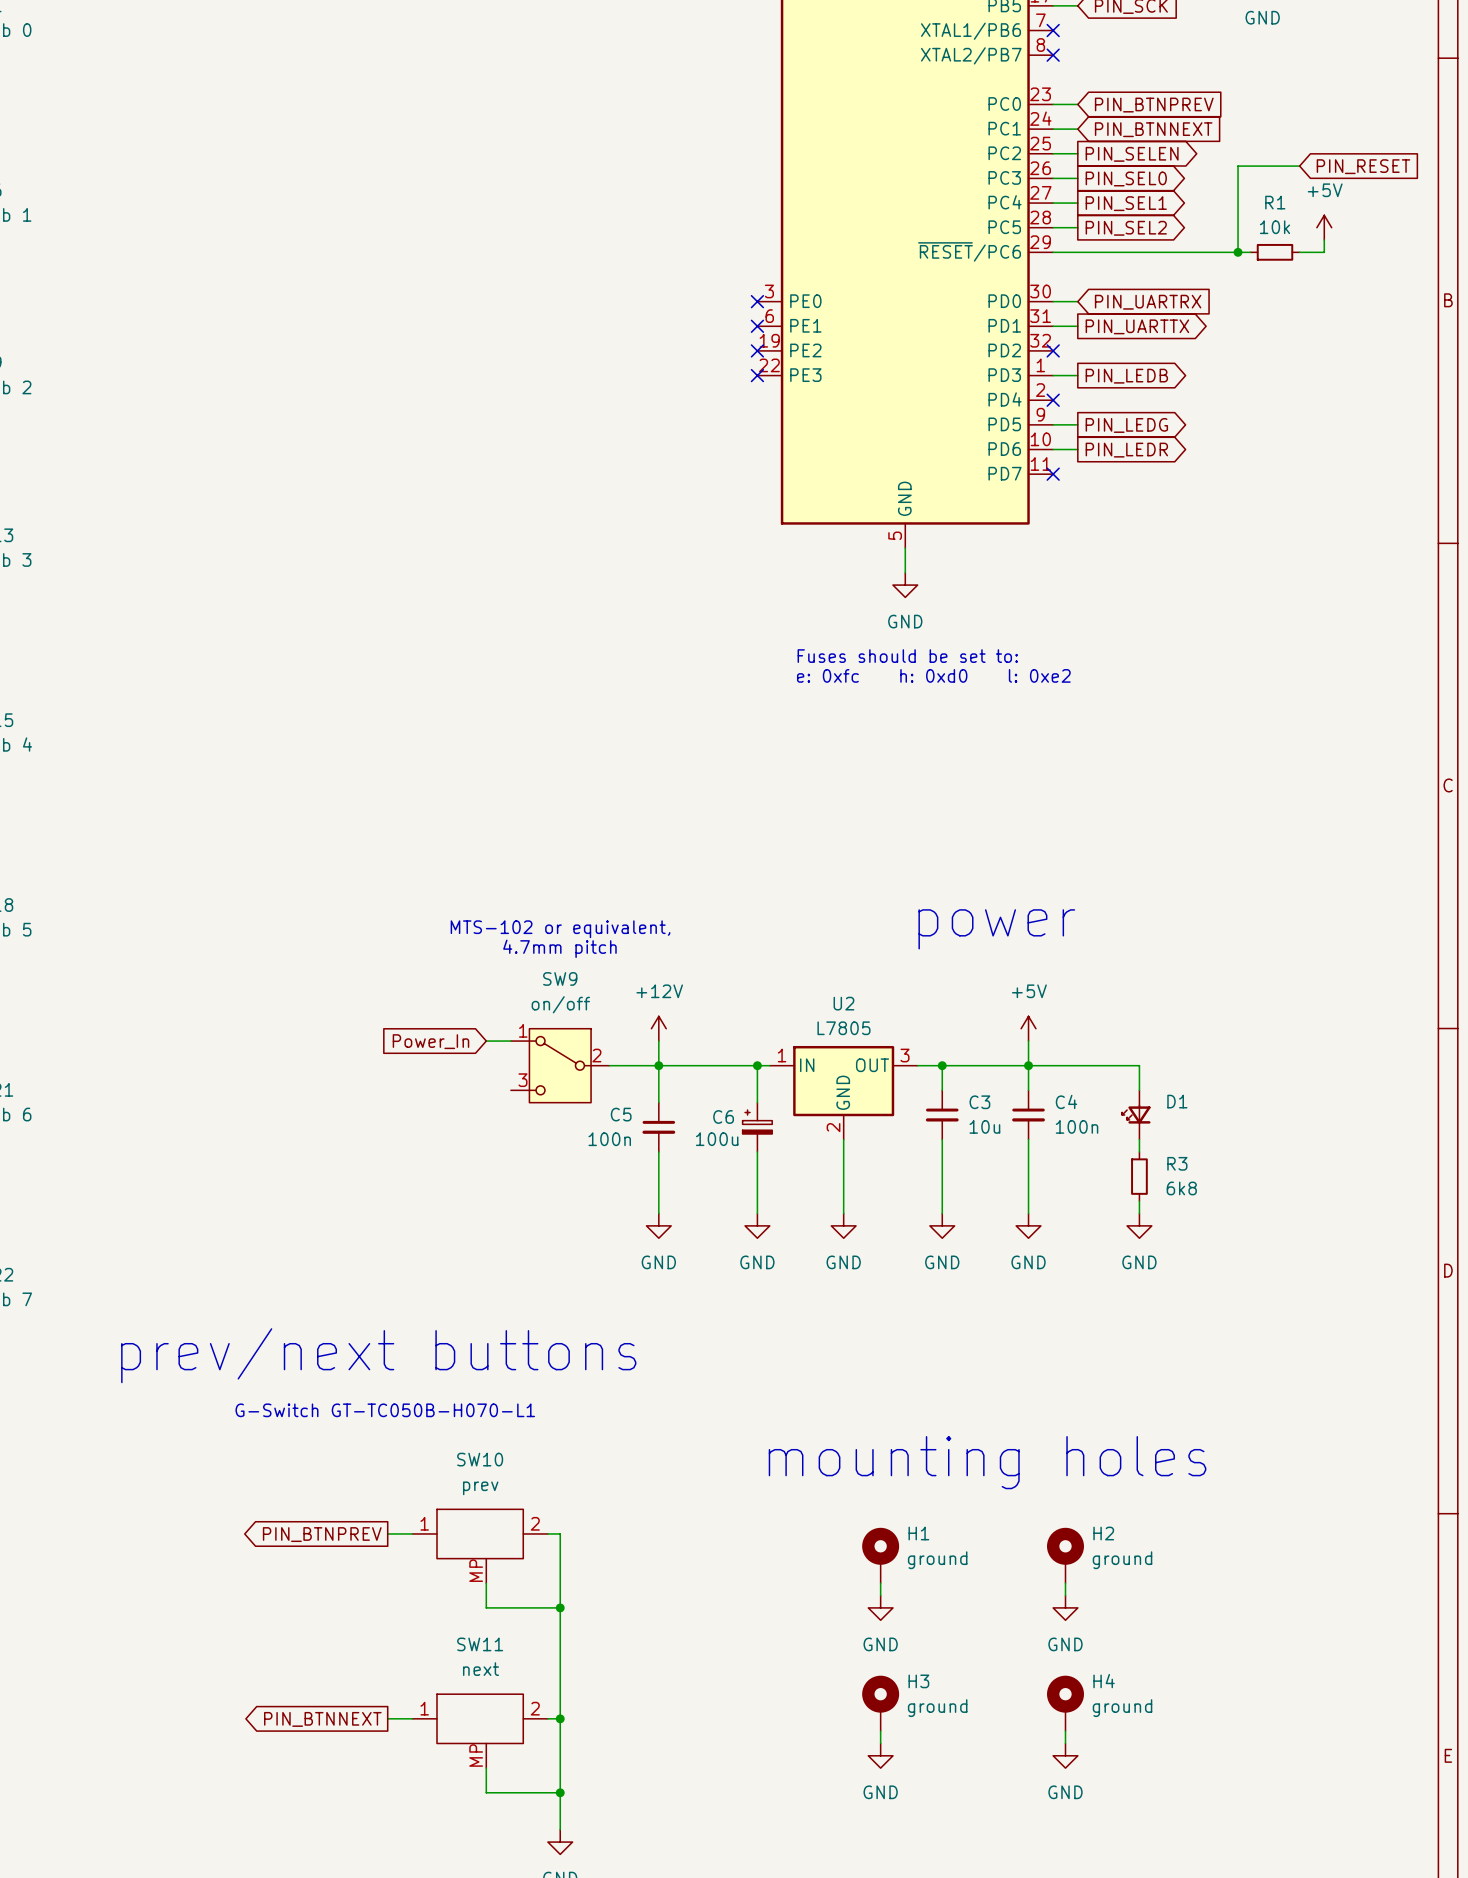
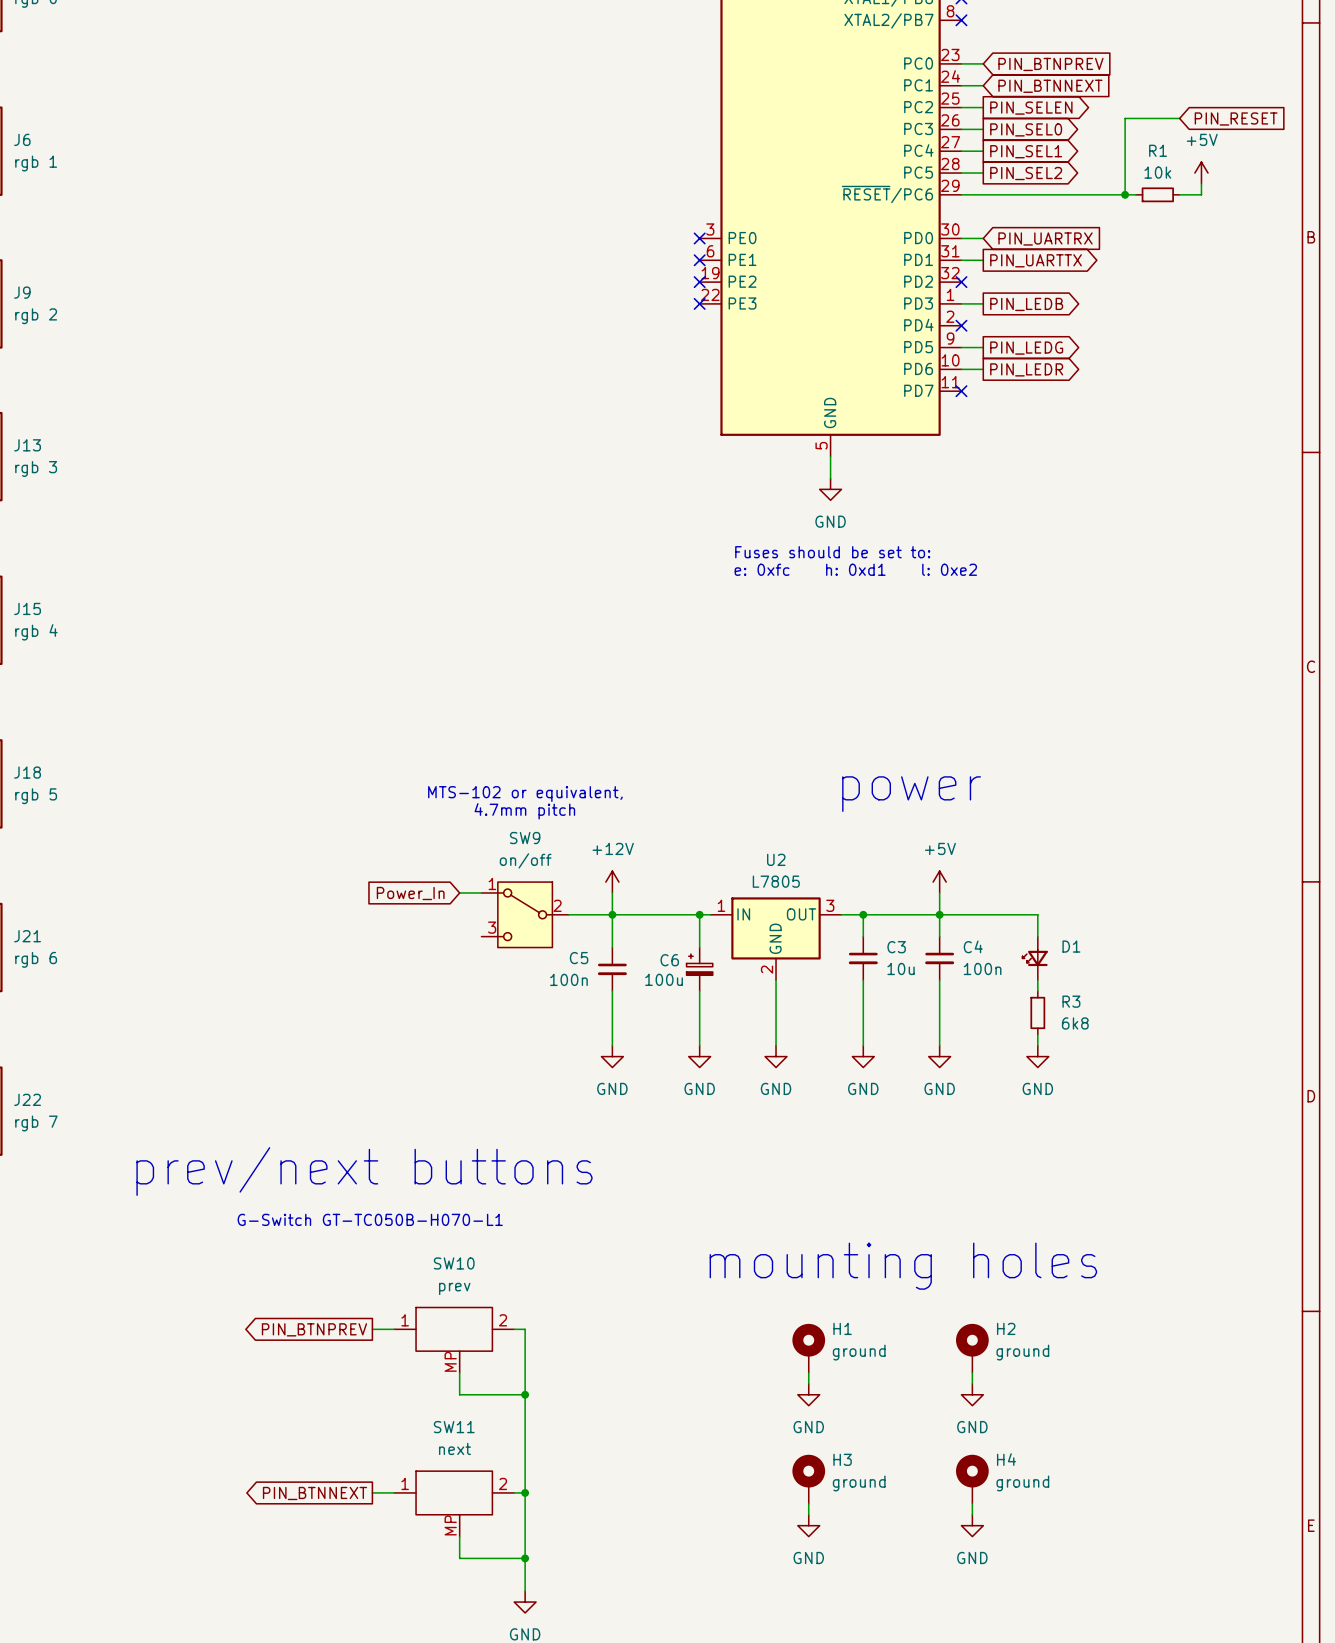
text: e: 0xfc h: 0xd0 l: 0xe2 (933, 675) -> e: 0xfc h: 0xd1 l: 0xe2 (855, 569)

